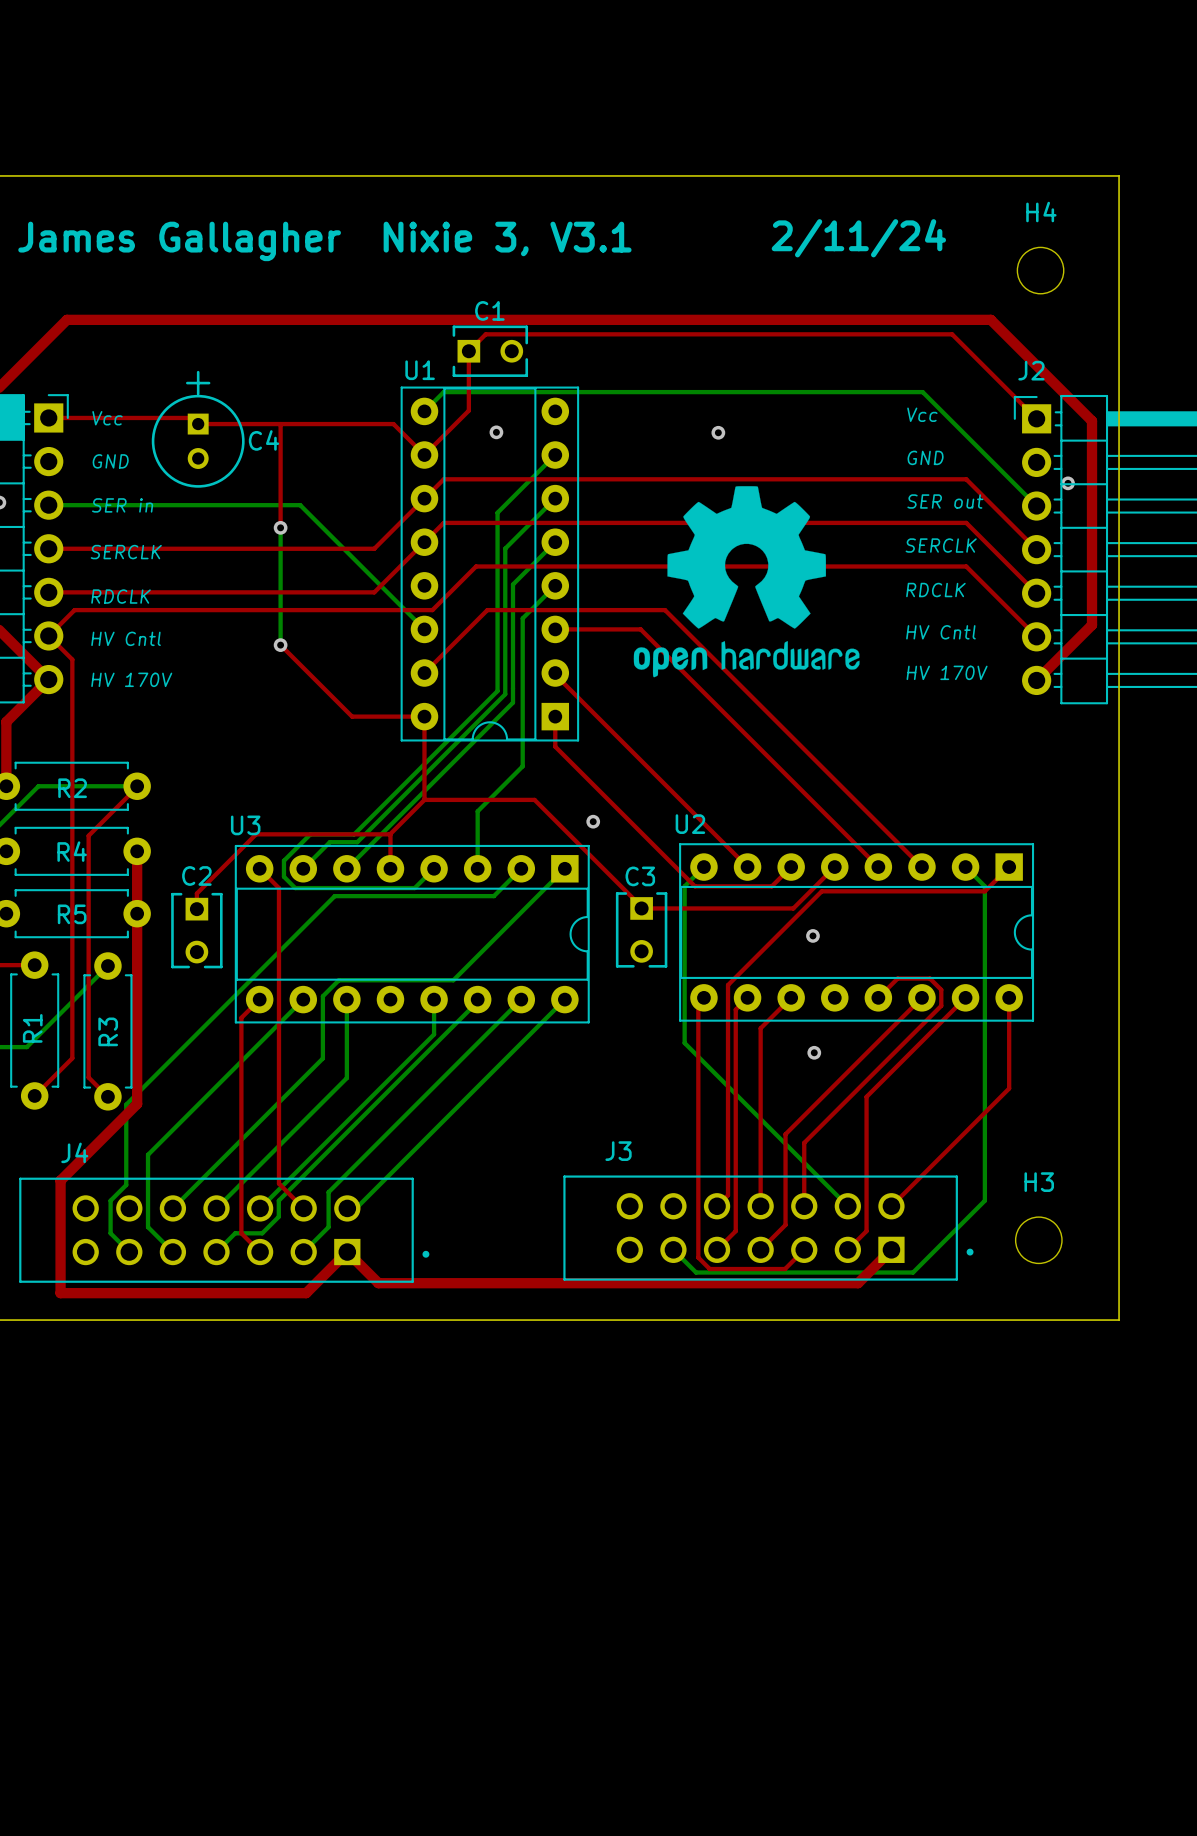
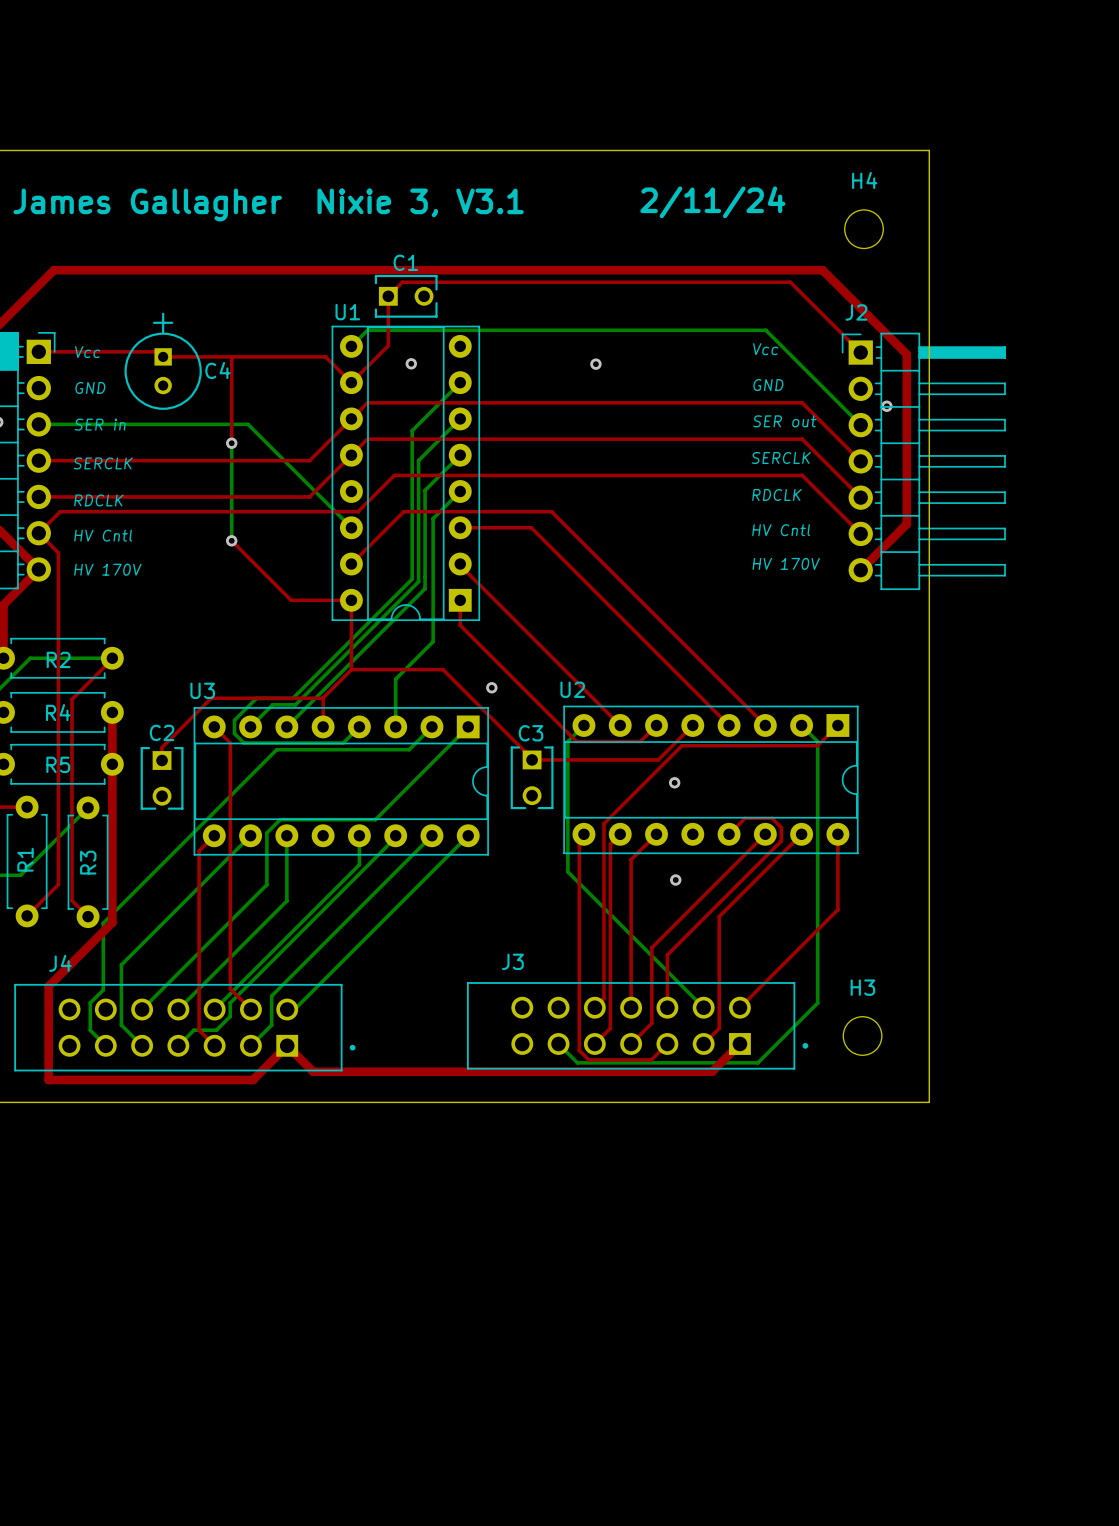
drawing: [633, 486, 860, 678] -> none

